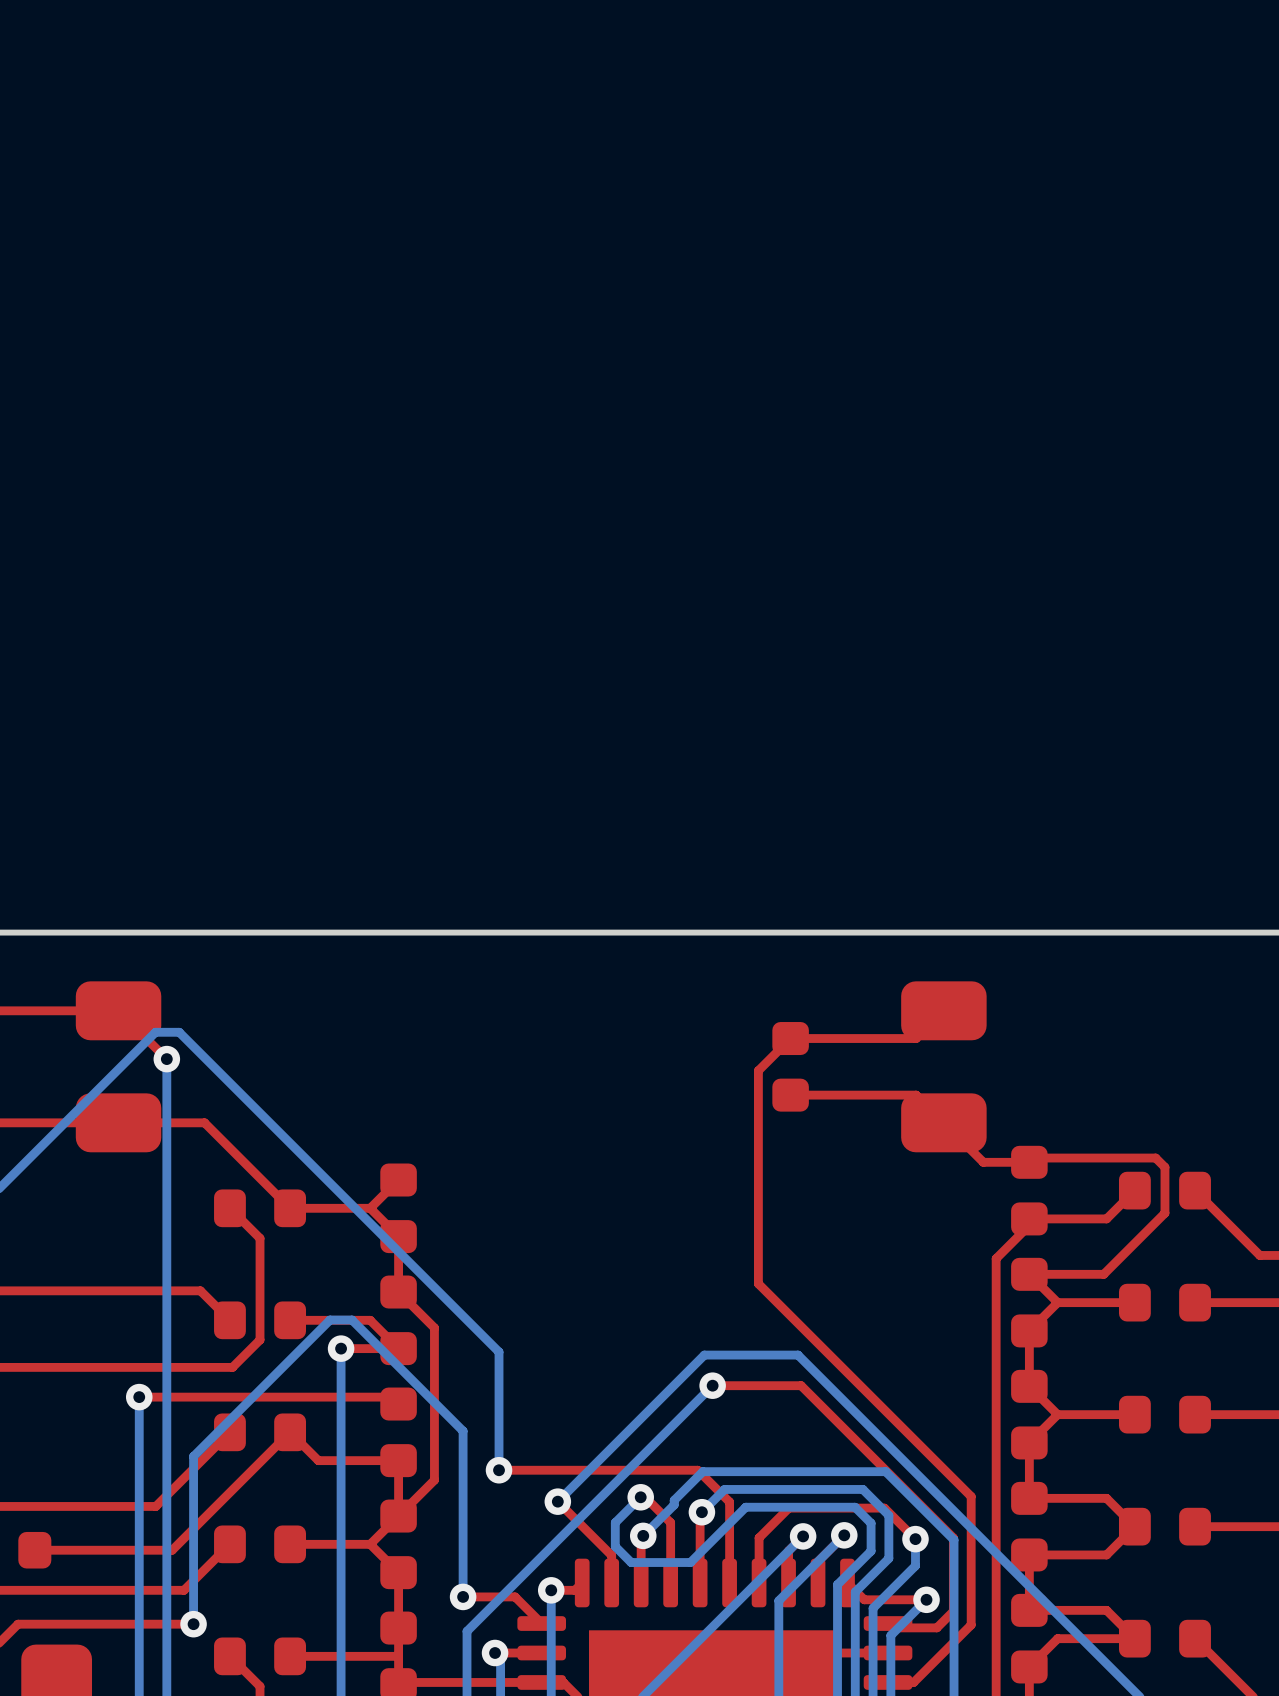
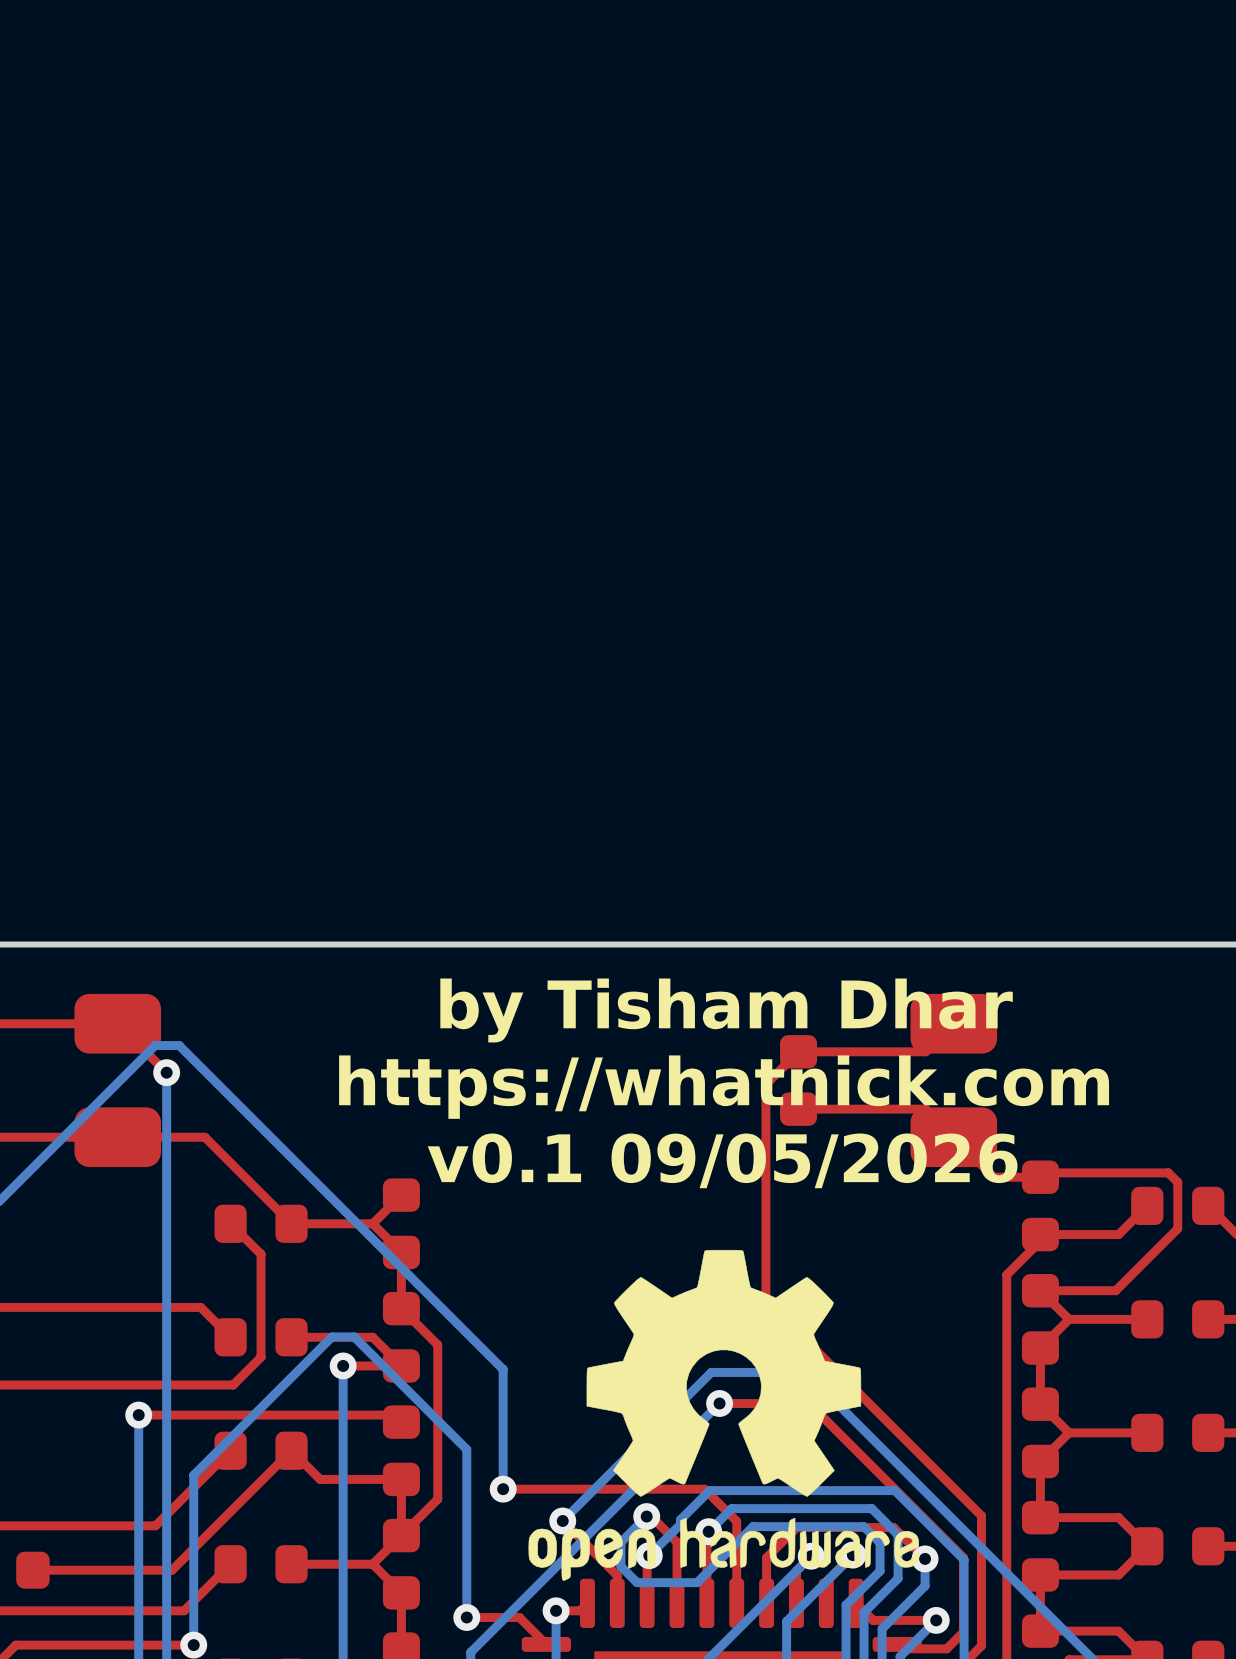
text: none -> by Tisham Dhar (726, 1010)
text: none -> https://whatnick.com (724, 1087)
text: none -> v0.1 09/05/2026 (722, 1160)
drawing: none -> [528, 1249, 920, 1581]

